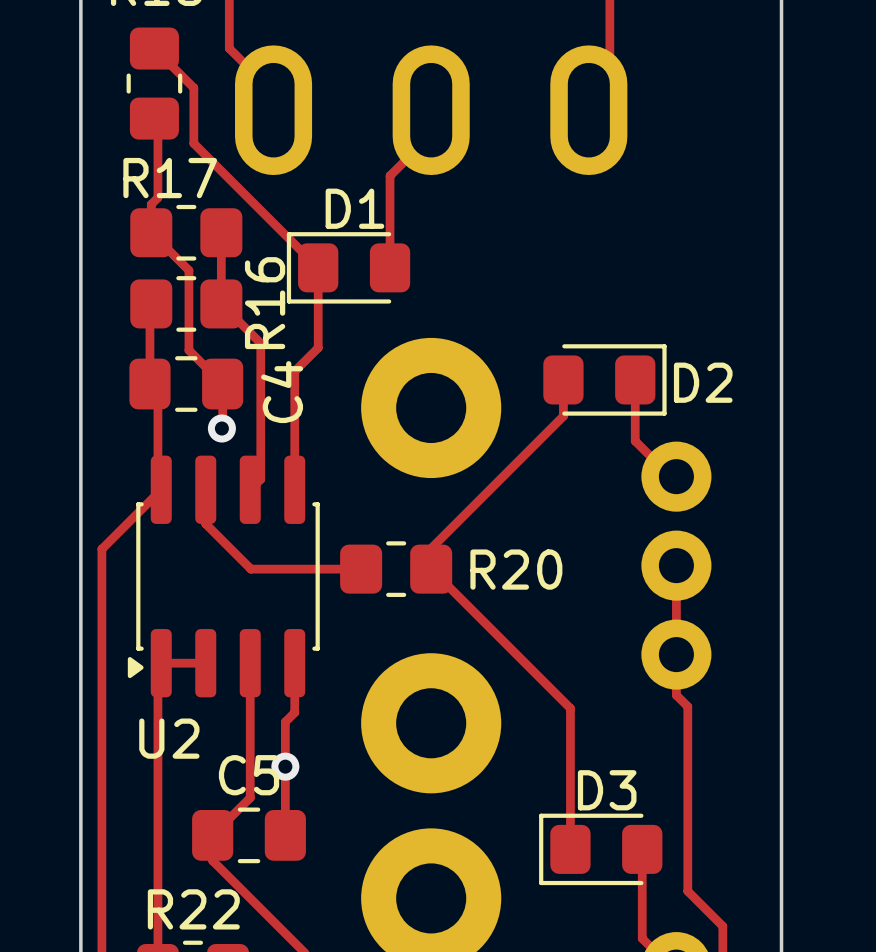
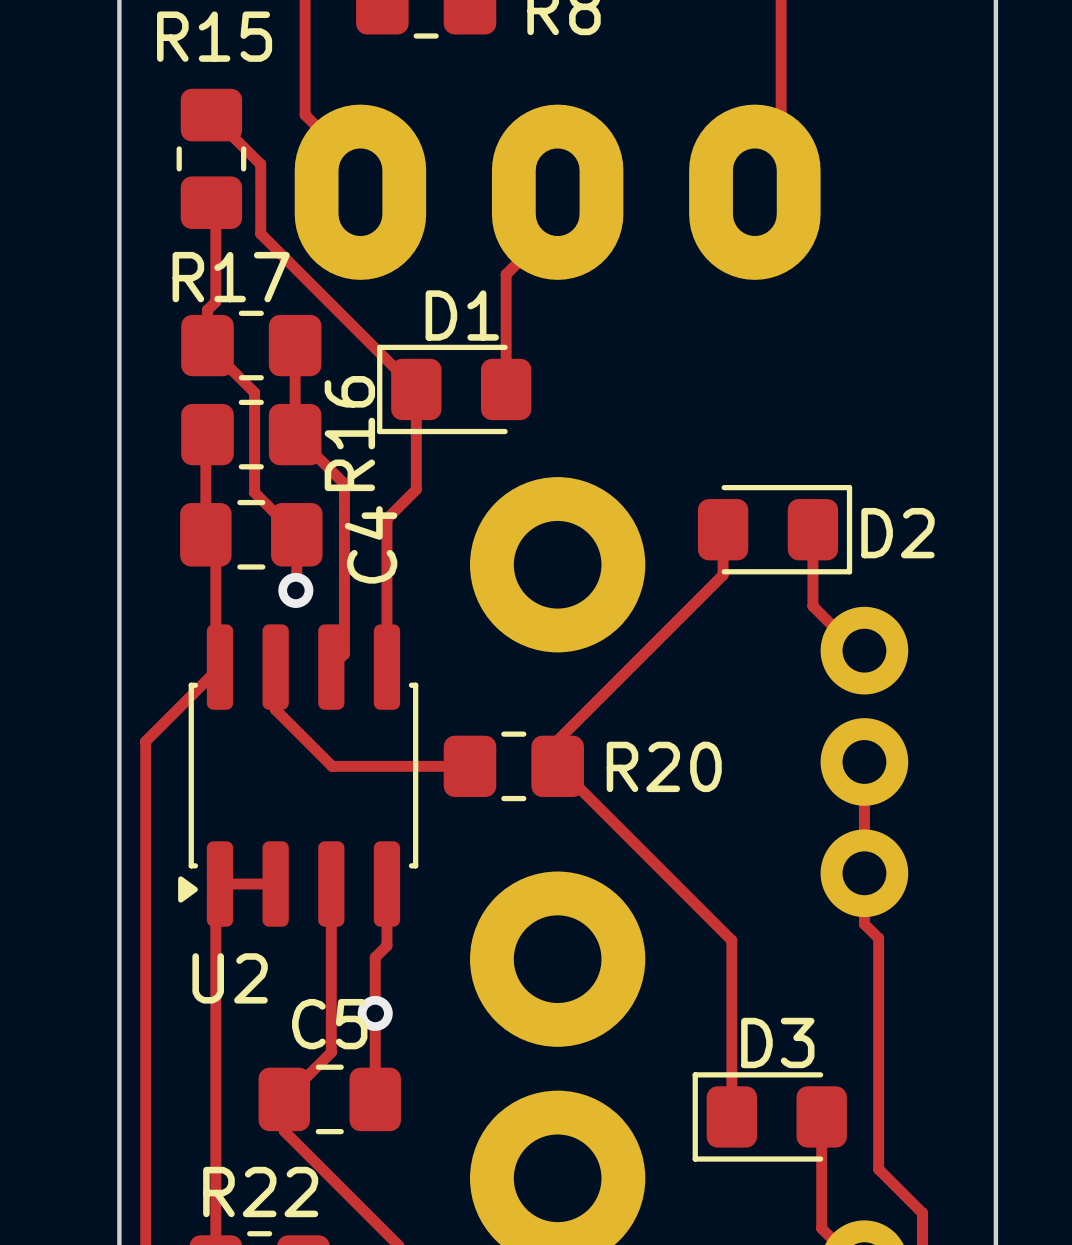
part footprint: [235, 45, 628, 176] -> [294, 104, 821, 280]

